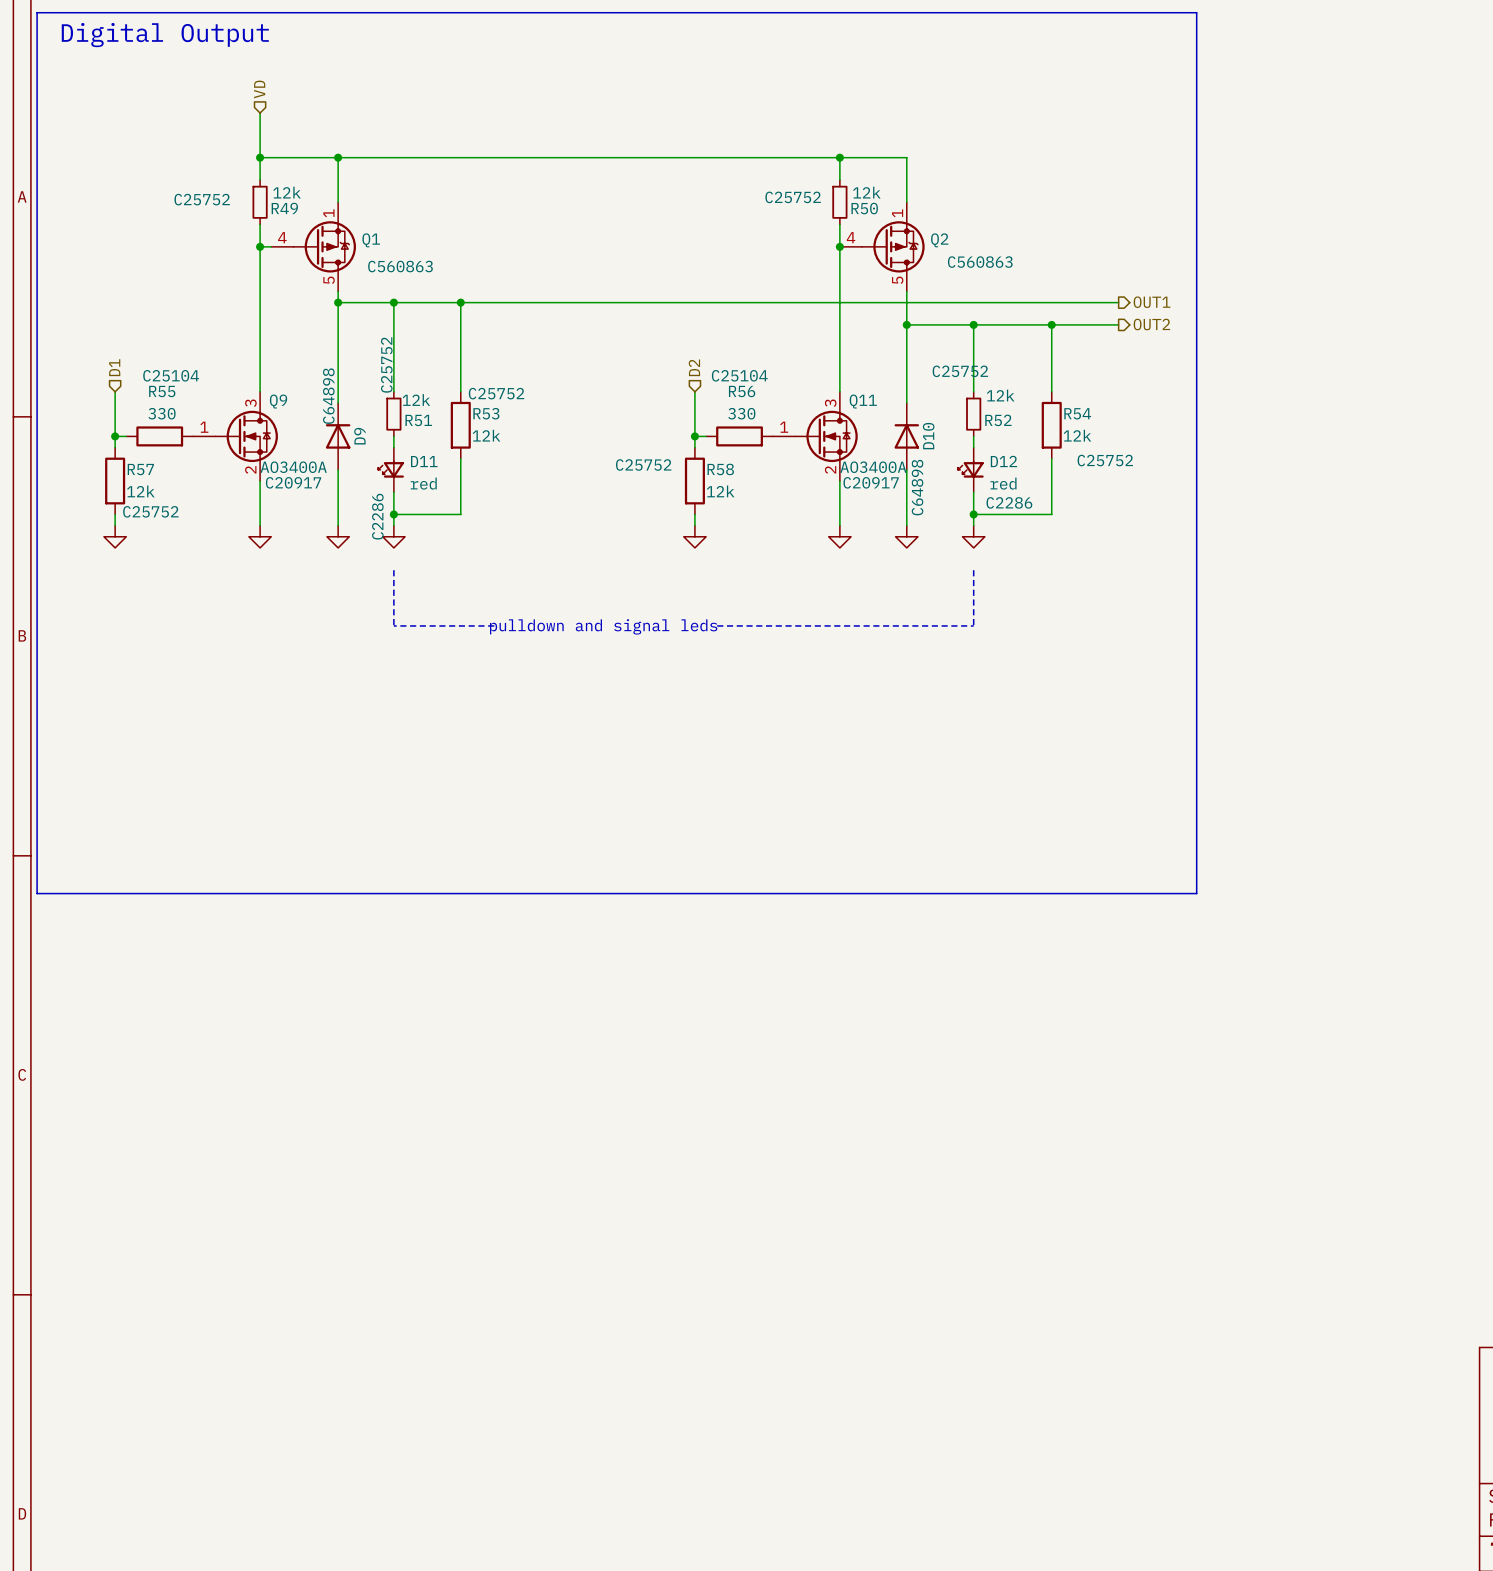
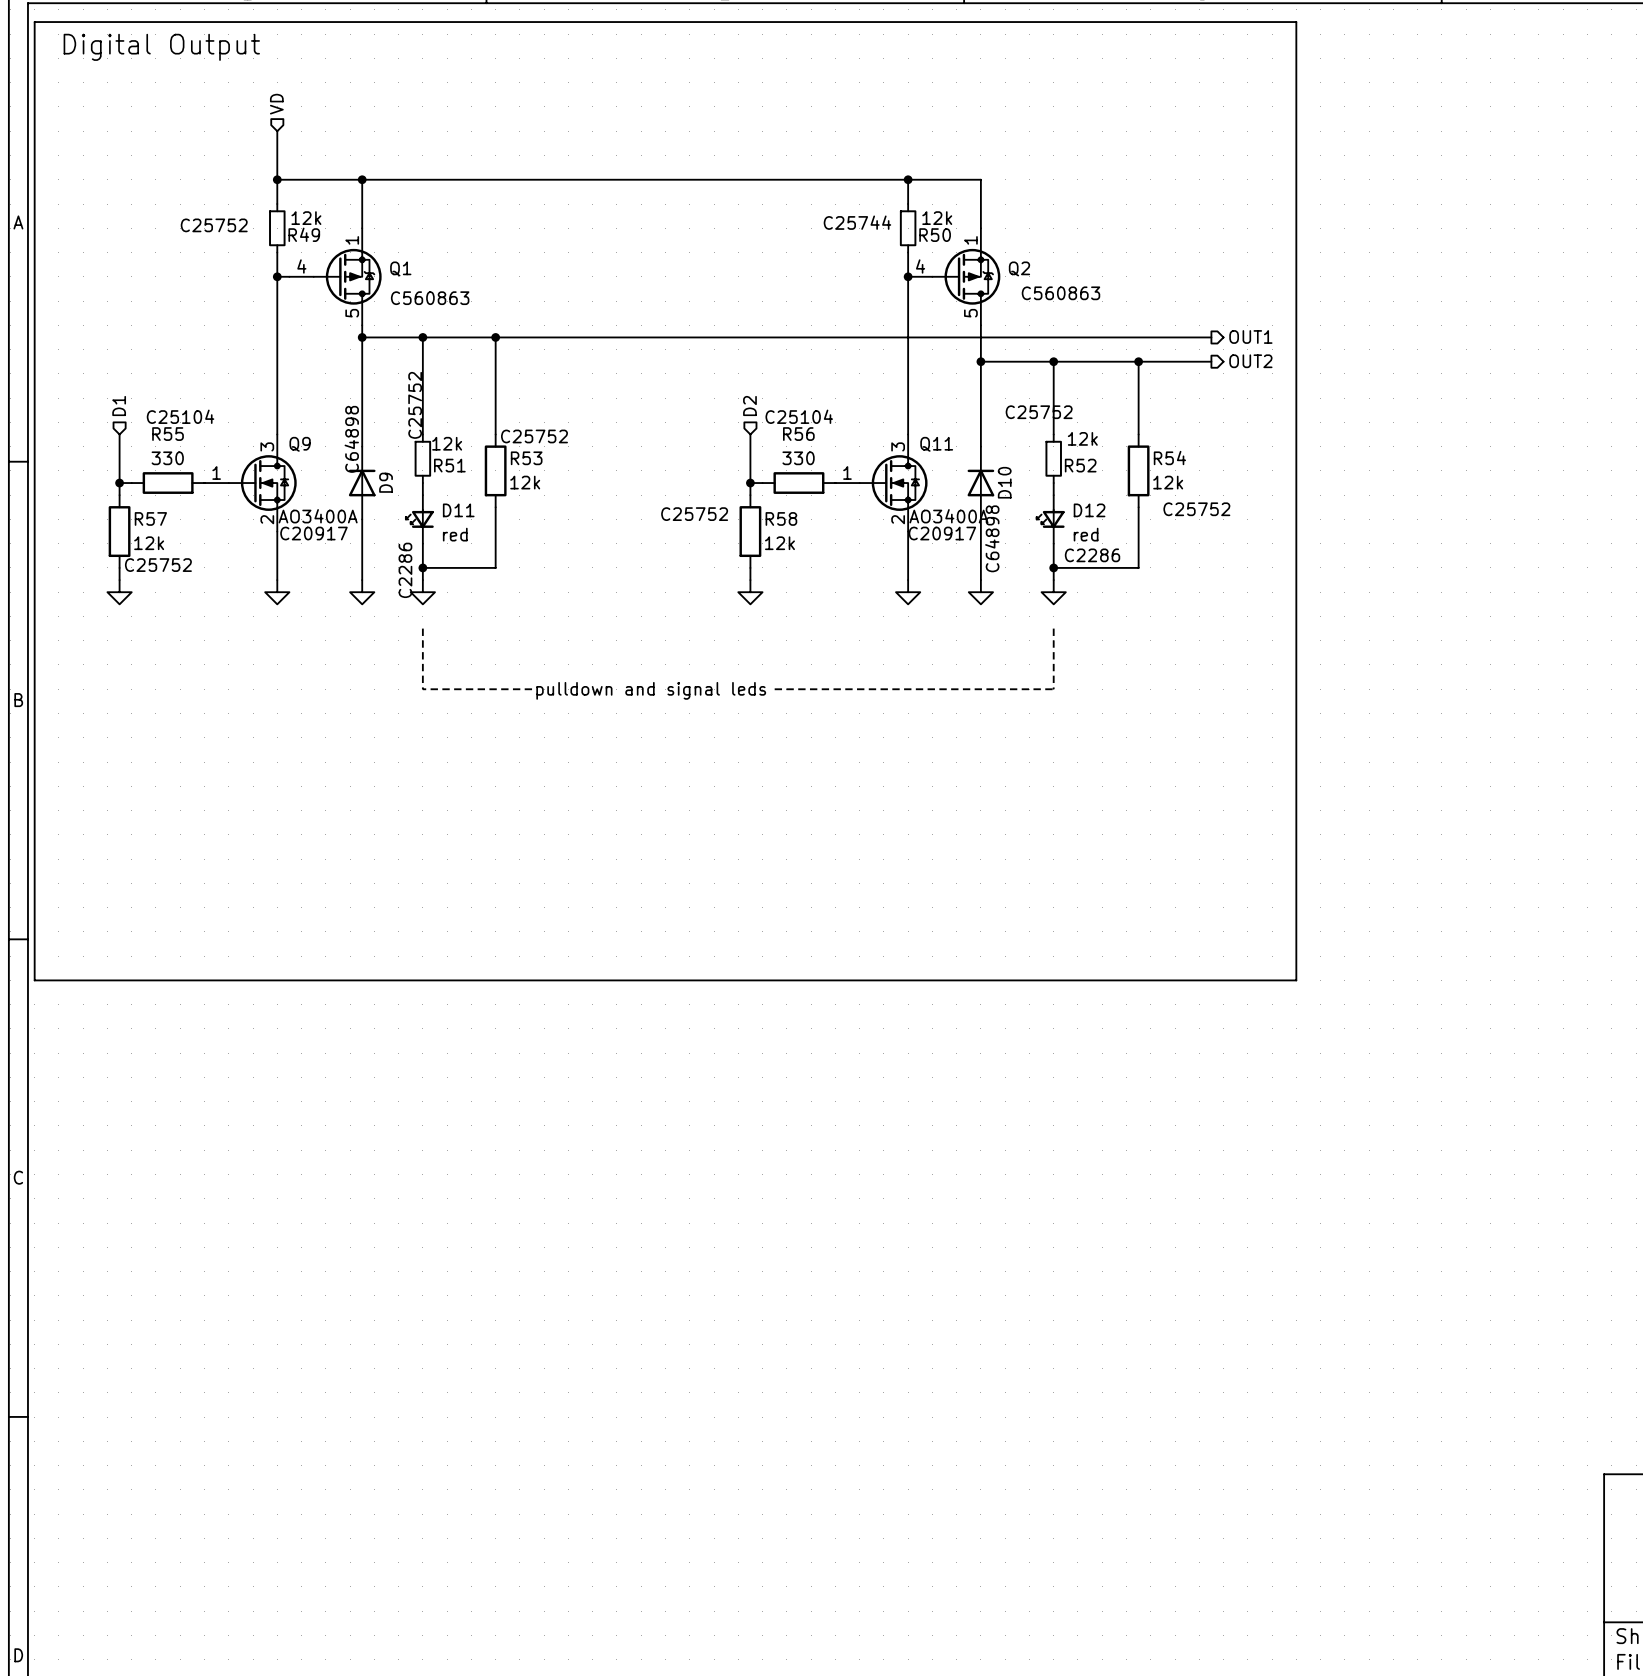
R50 text: C25752 (793, 197) -> C25744 (857, 222)

